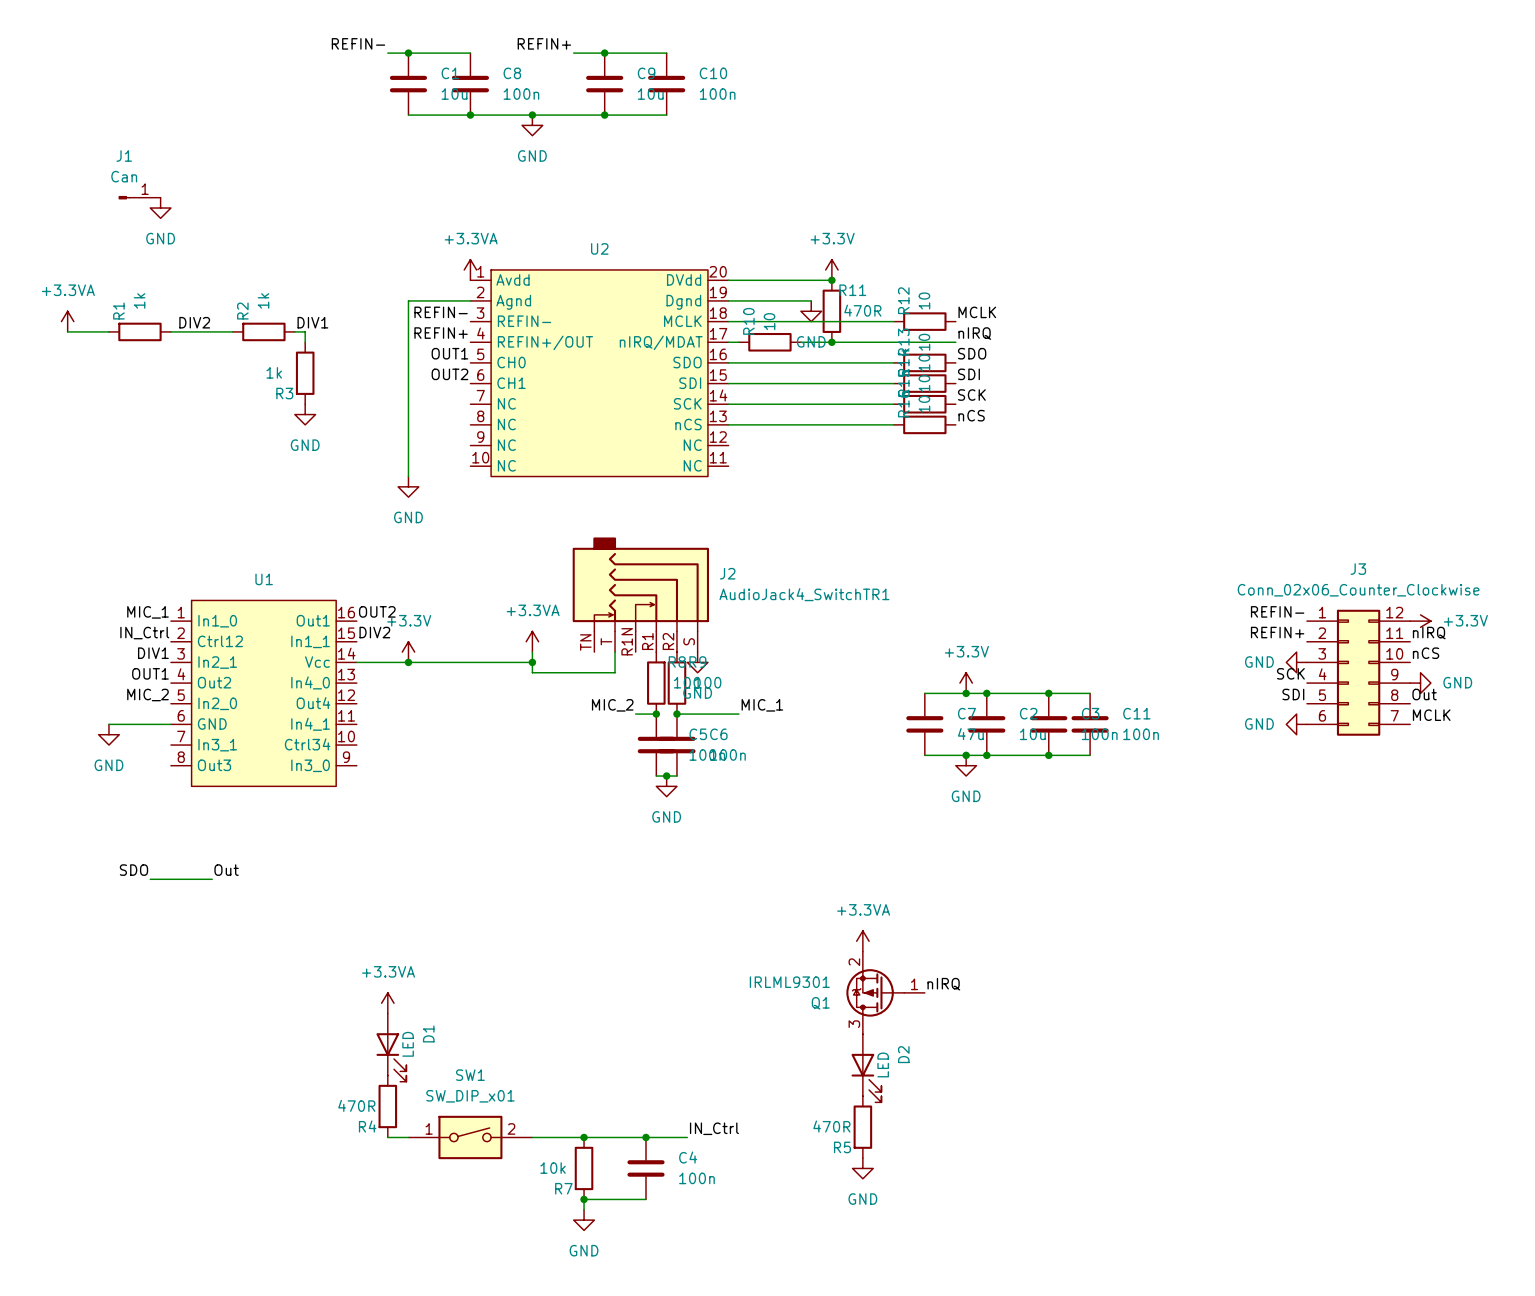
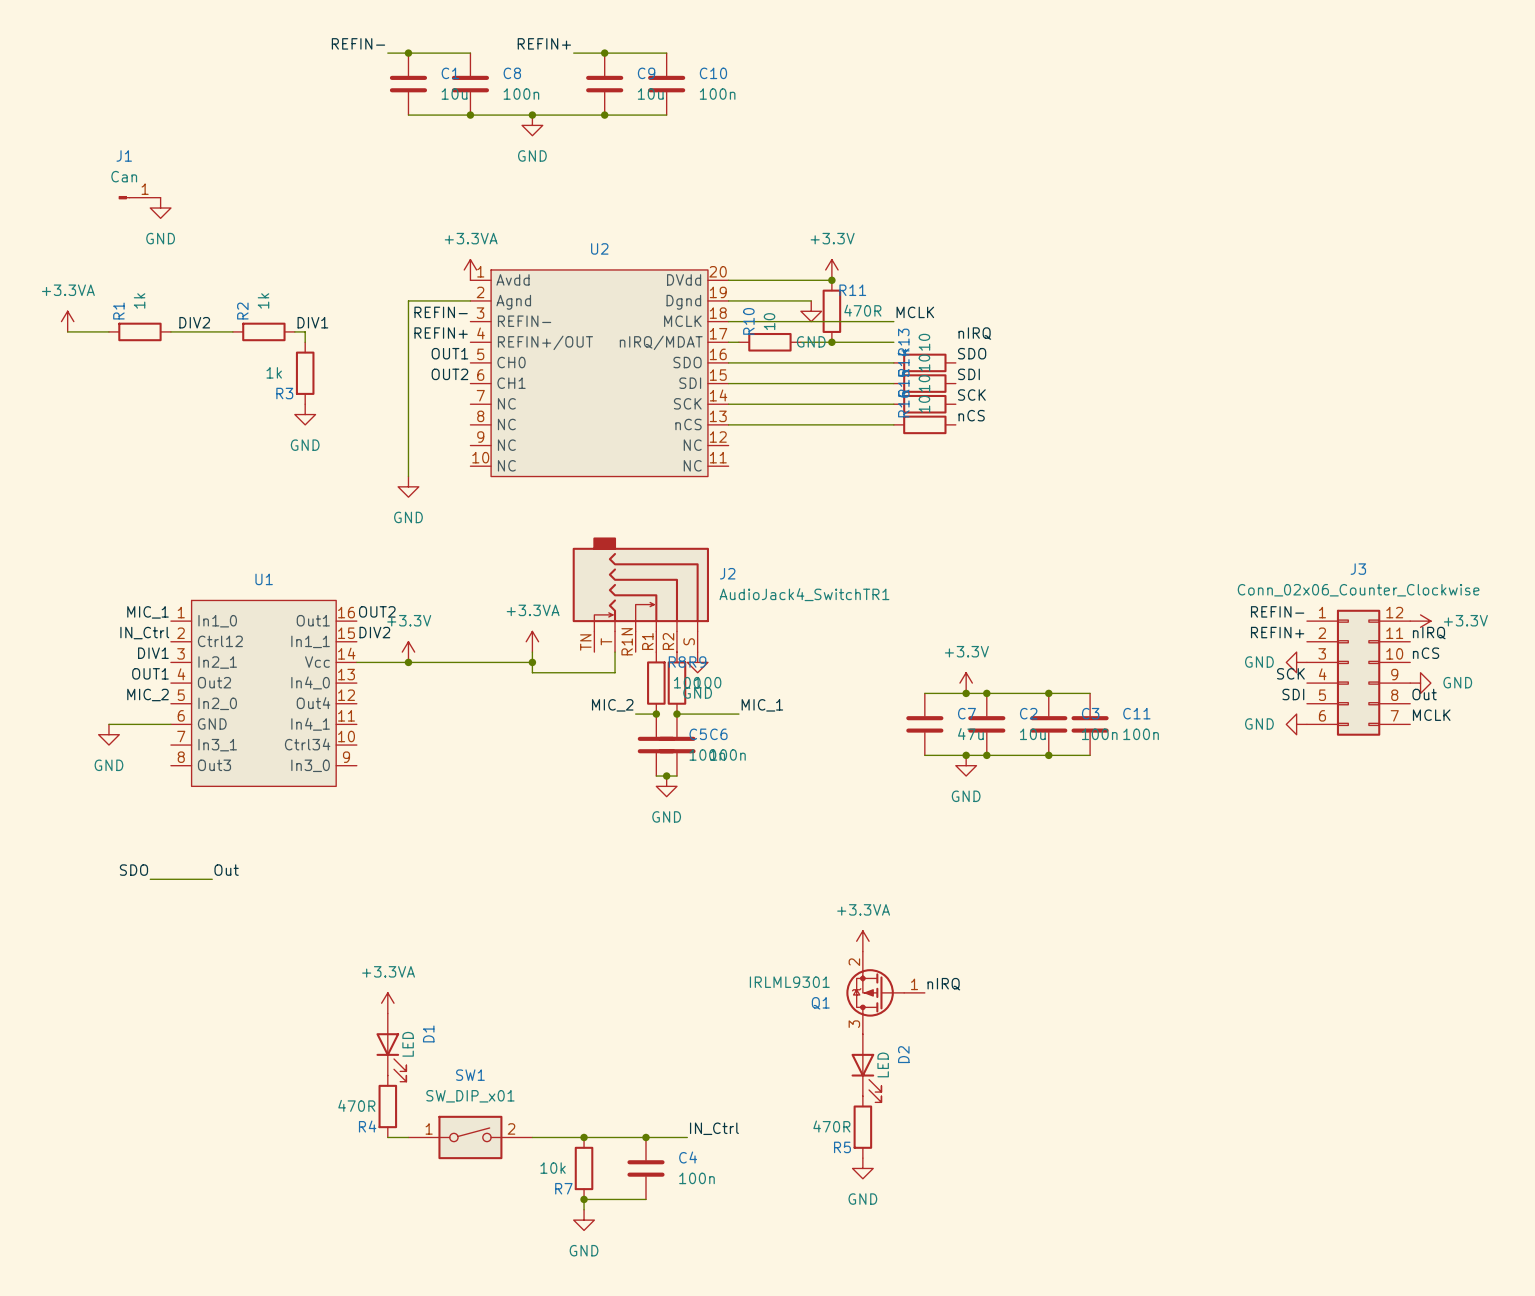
label position: MCLK (977, 312) -> MCLK (915, 312)
R12: 10 (924, 321) -> none
wire: (893, 342) (955, 342) -> none

